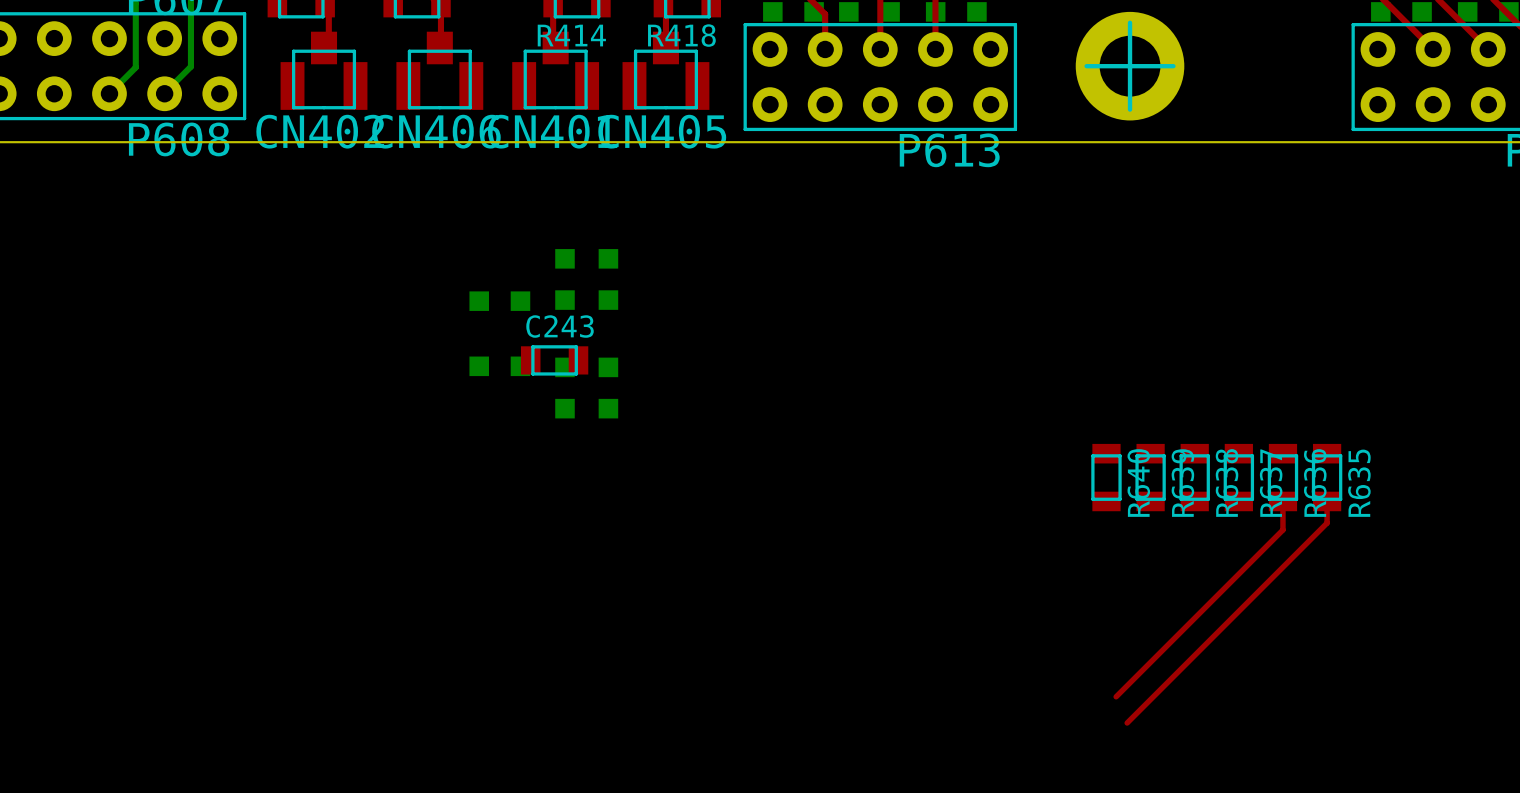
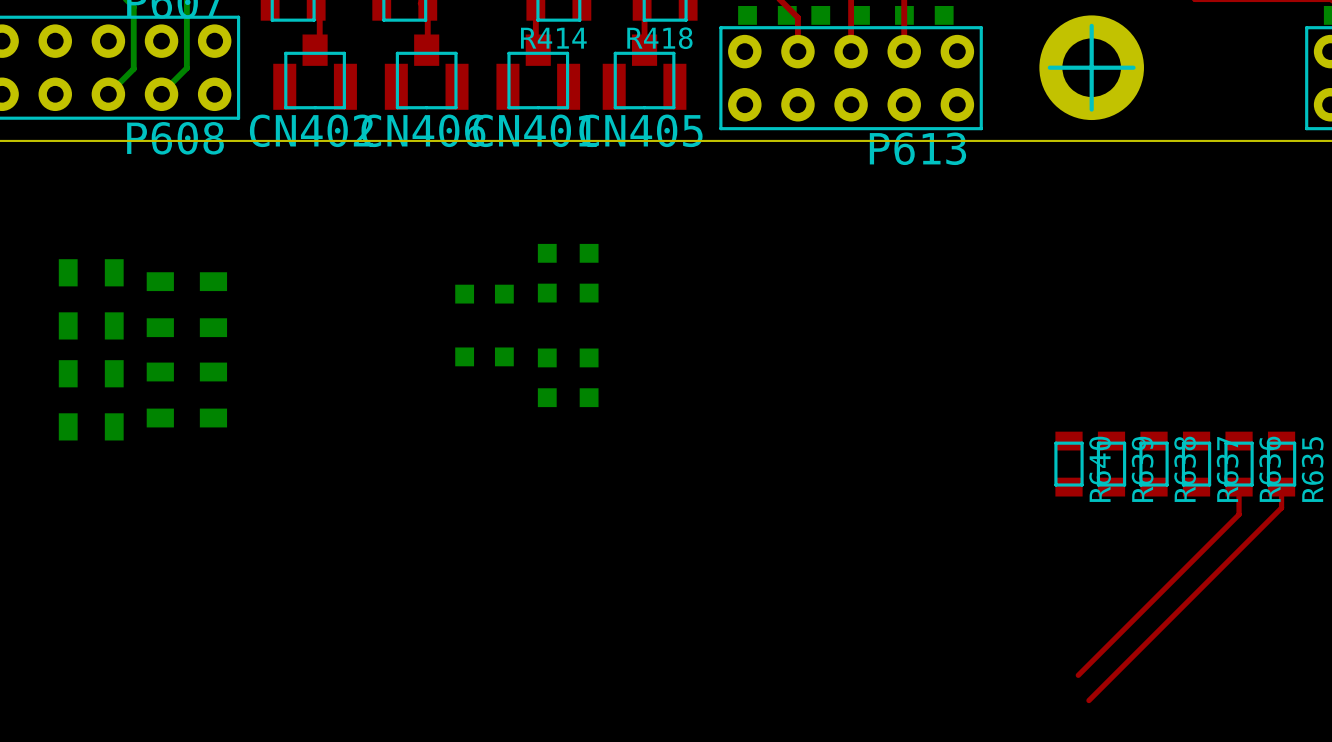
part: none -> (91, 272)
part: none -> (160, 304)
part: none -> (91, 325)
C243 side: top (554, 360) -> bottom (213, 304)
part: none -> (91, 373)
part: none -> (160, 395)
part: none -> (213, 395)
part: none -> (91, 426)

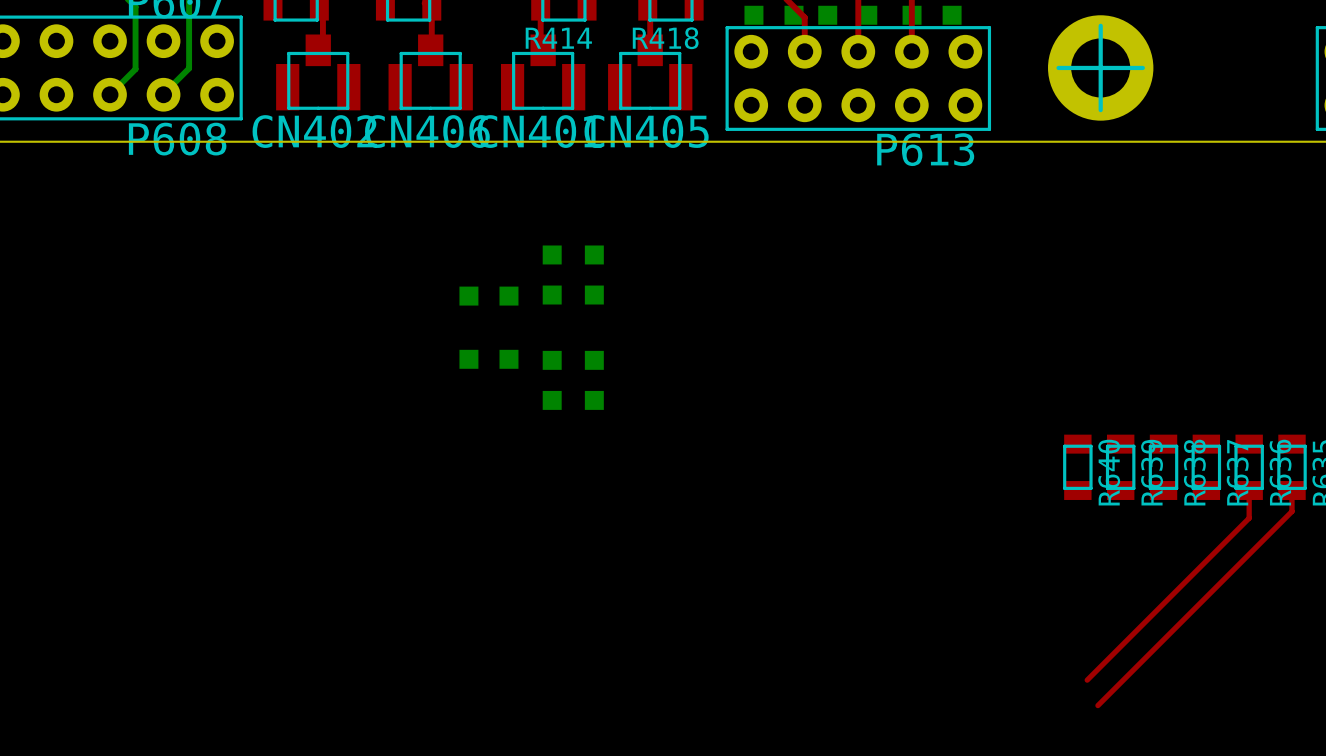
part: (91, 272) -> none
part: (160, 304) -> none
part: (213, 304) -> none
part: (91, 325) -> none
part: (91, 373) -> none
part: (160, 395) -> none
part: (213, 395) -> none
part: (91, 426) -> none

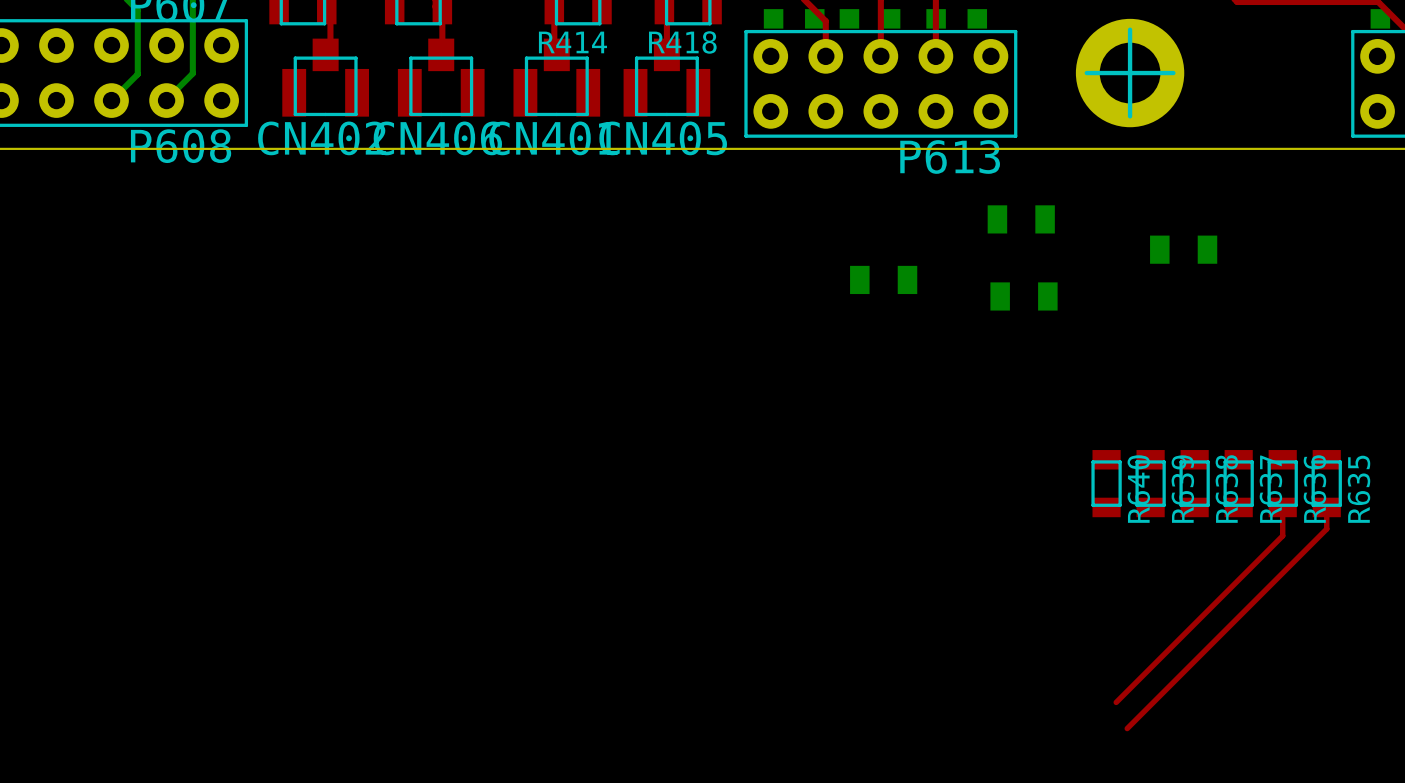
part: none -> (1021, 219)
part: none -> (1183, 249)
part: none -> (883, 279)
part: (552, 275) -> none
part: (594, 275) -> none
part: none -> (1024, 296)
part: (488, 296) -> none
part: (488, 359) -> none
part: (552, 380) -> none
part: (594, 380) -> none

